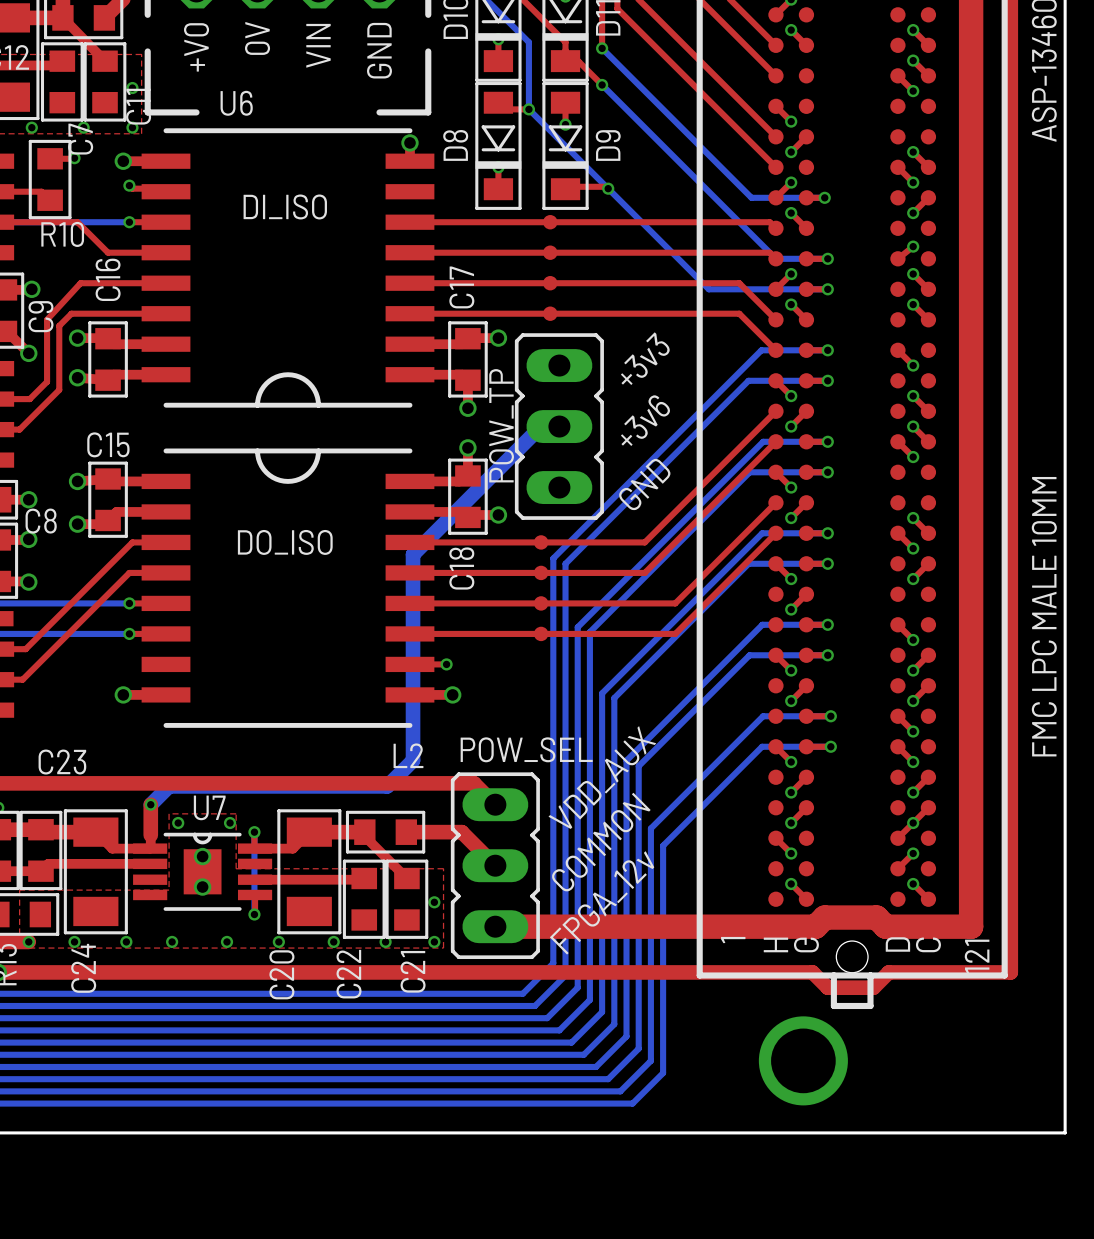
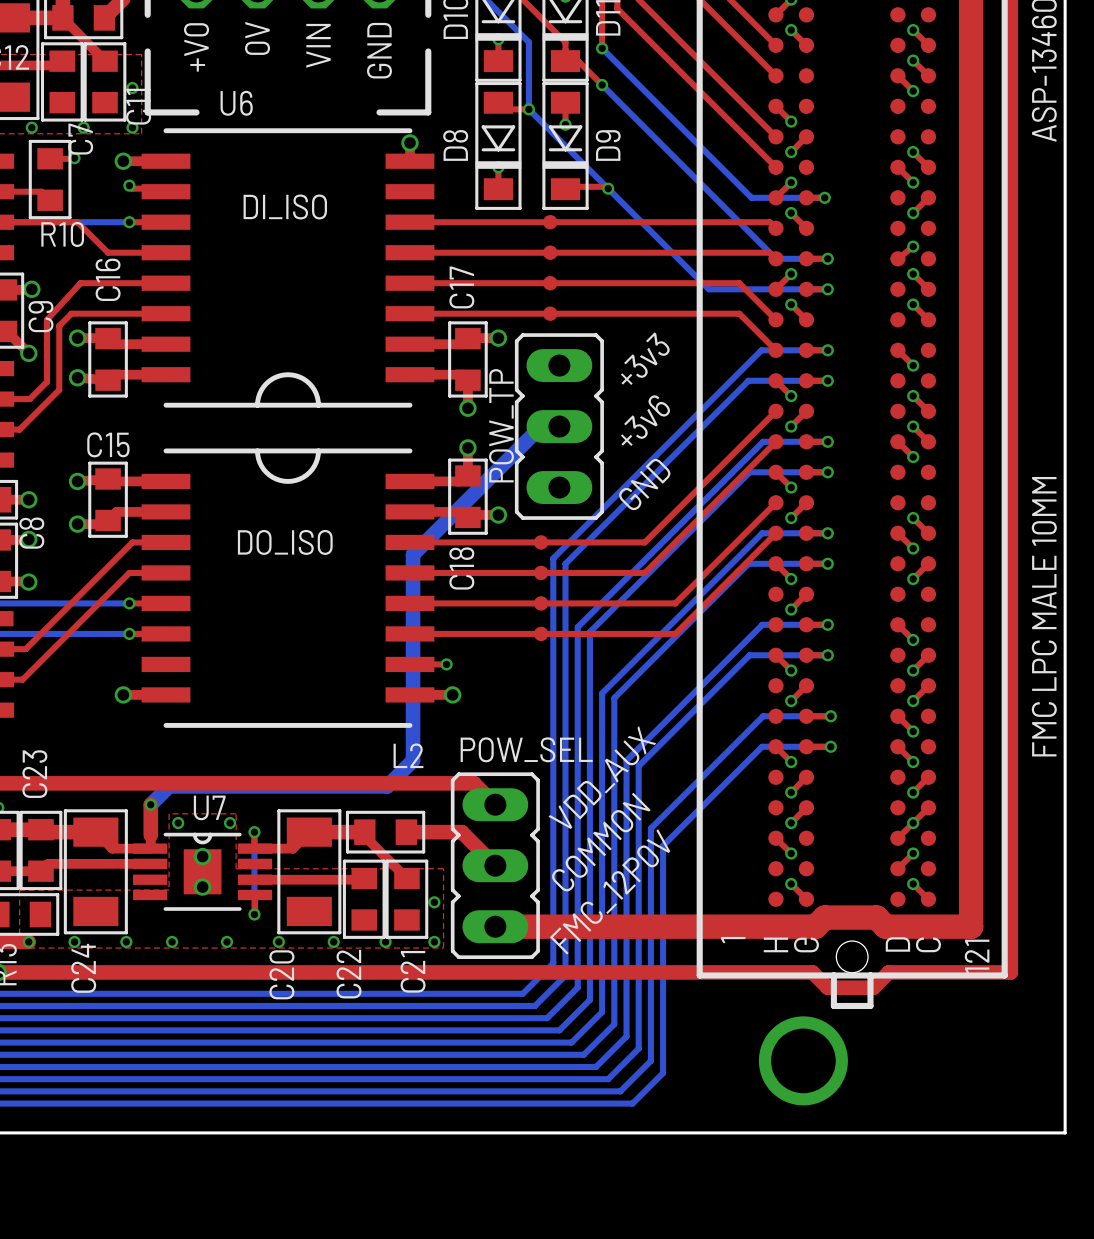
C8 name rotation: 0° (41, 521) -> 90° counterclockwise (31, 533)
C23 name rotation: 0° (62, 762) -> 90° counterclockwise (34, 774)
text: FPGA_12v (602, 902) -> FMC_12P0V (610, 891)

